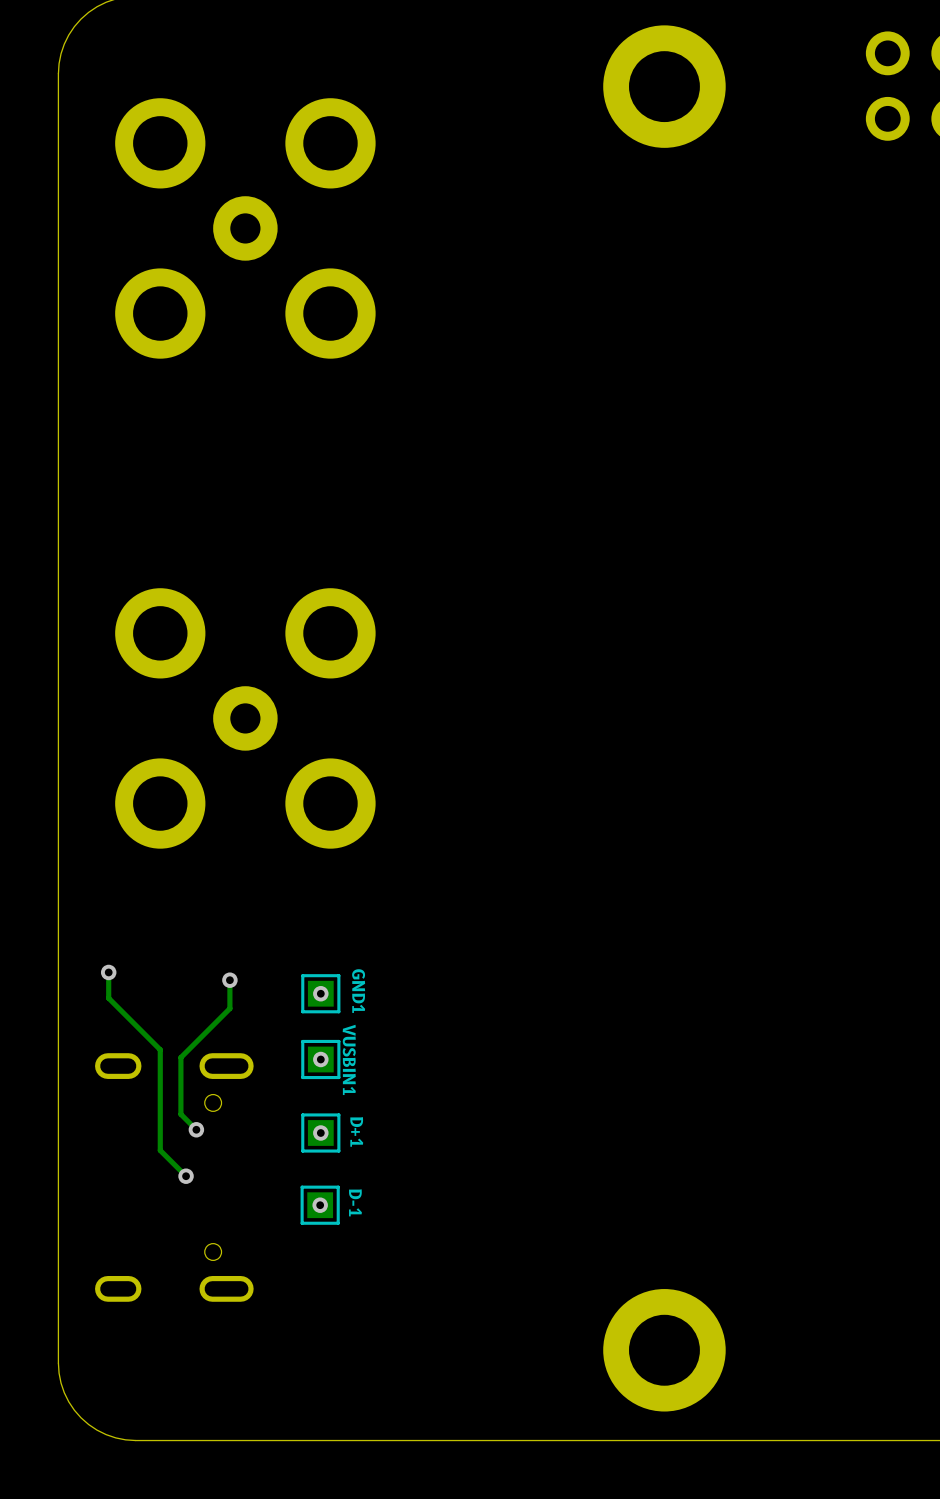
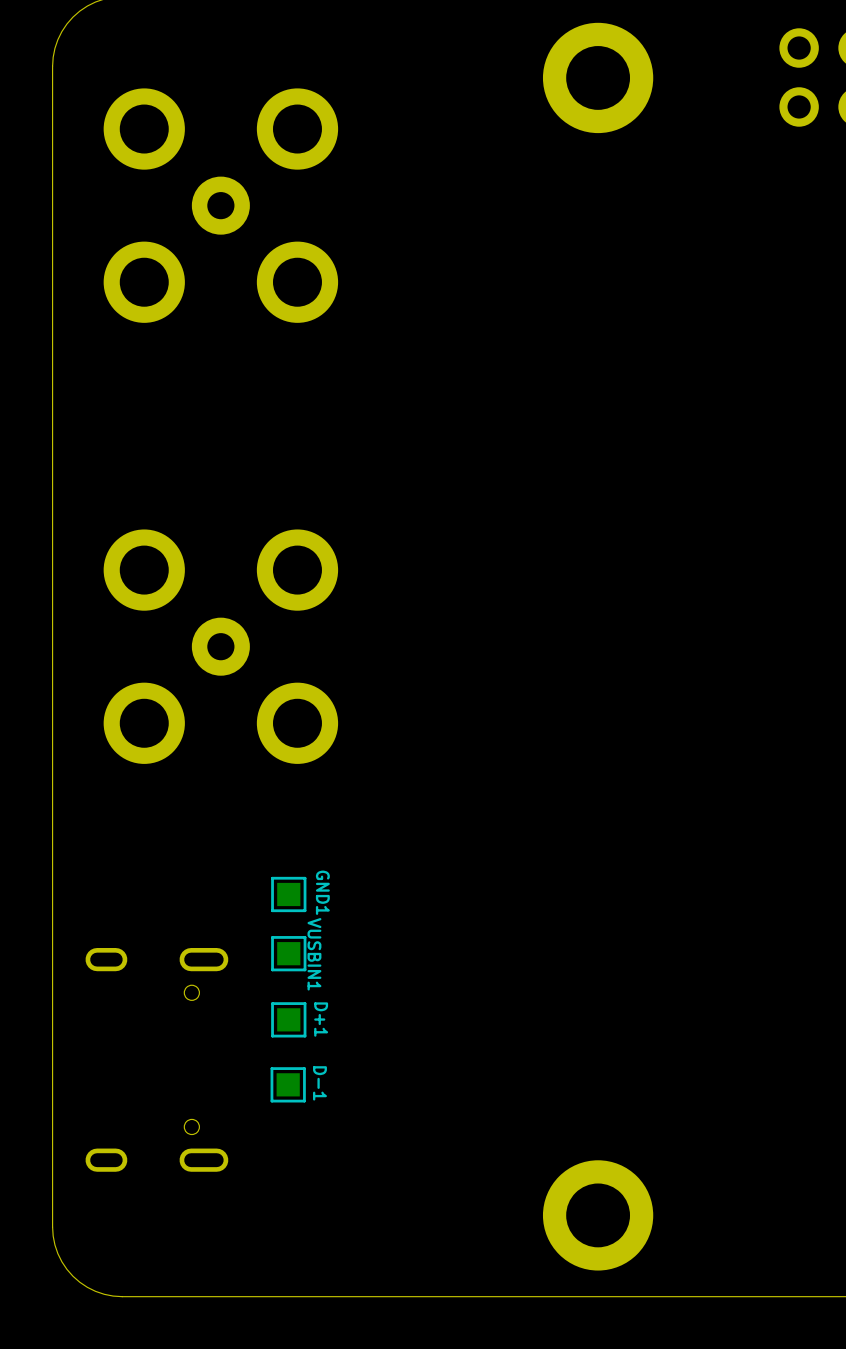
track: (108, 972) (108, 998) (160, 1049) (160, 1150) (186, 1176) -> none
via: (108, 972) -> none
track: (229, 980) (229, 1008) (180, 1057) (180, 1114) (196, 1129) -> none
via: (229, 980) -> none
via: (320, 993) -> none
via: (320, 1059) -> none
via: (196, 1129) -> none
via: (320, 1132) -> none
via: (186, 1176) -> none
via: (320, 1205) -> none

